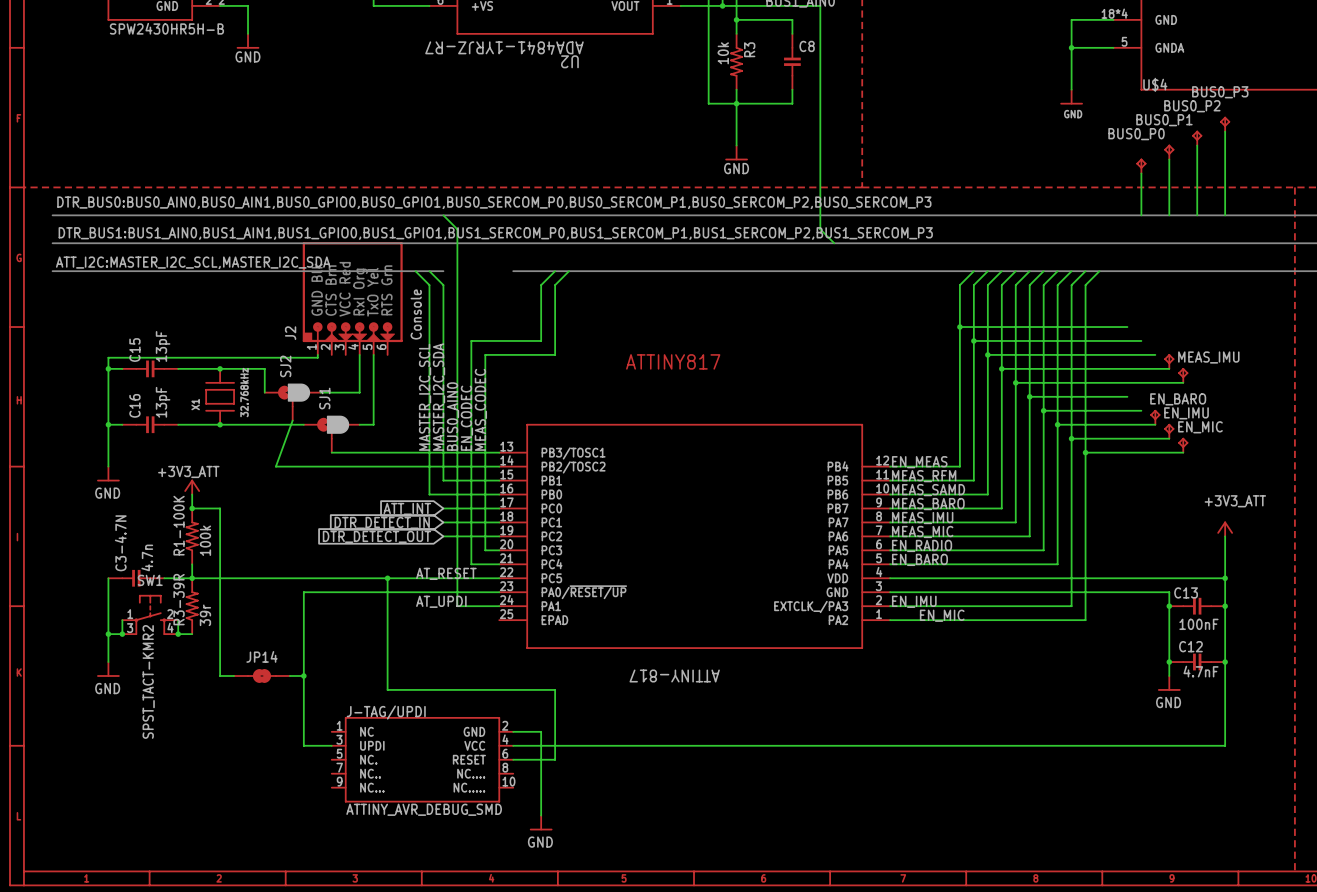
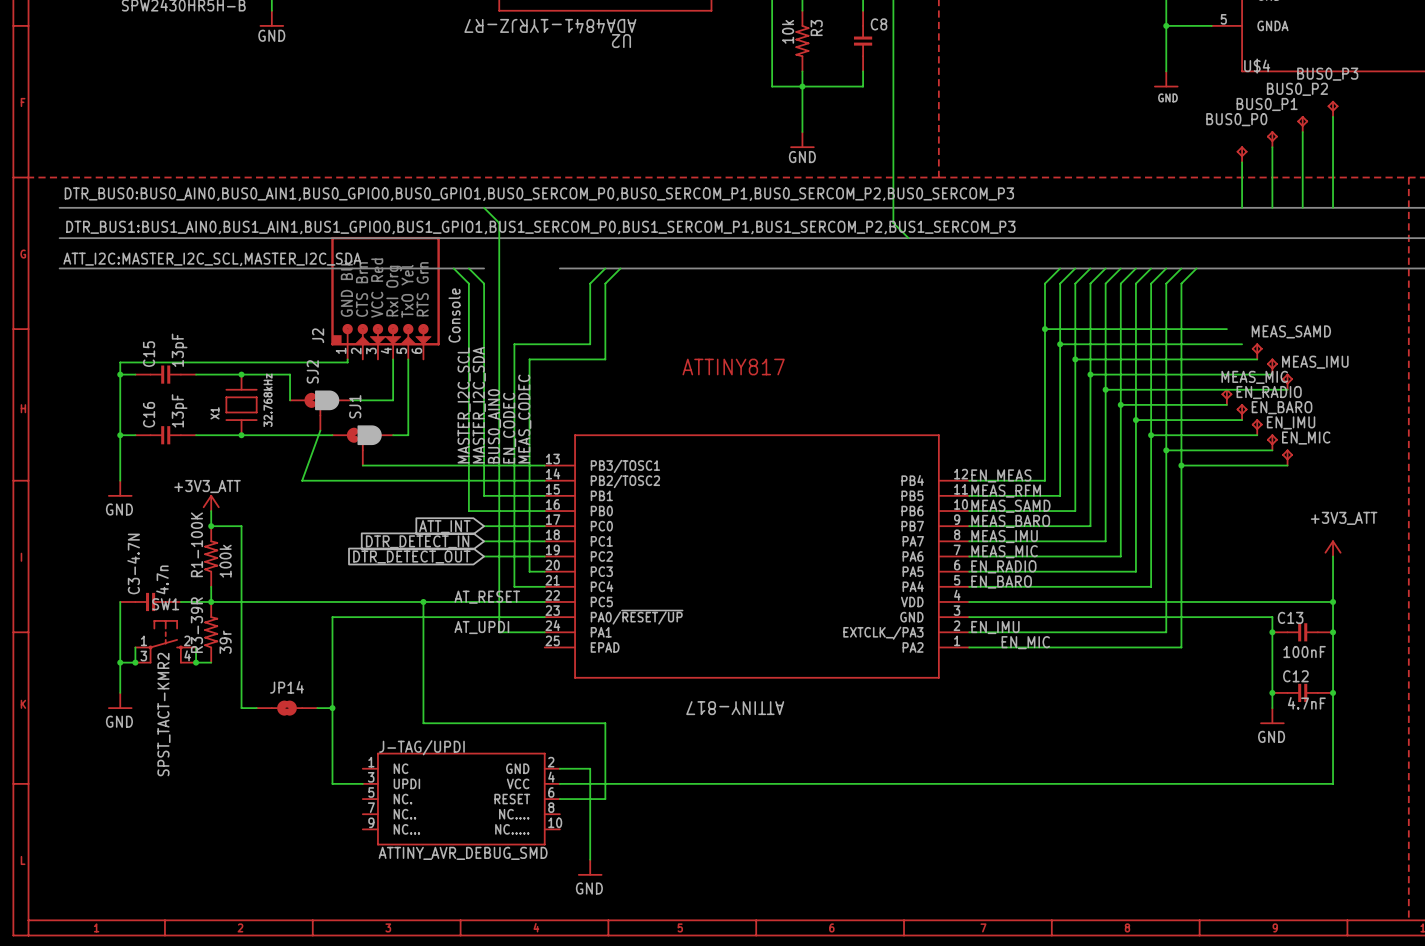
MEAS_SAMD: none -> (1257, 351)
MEAS_MIC: none -> (1226, 396)
EN_RADIO: none -> (1242, 412)

